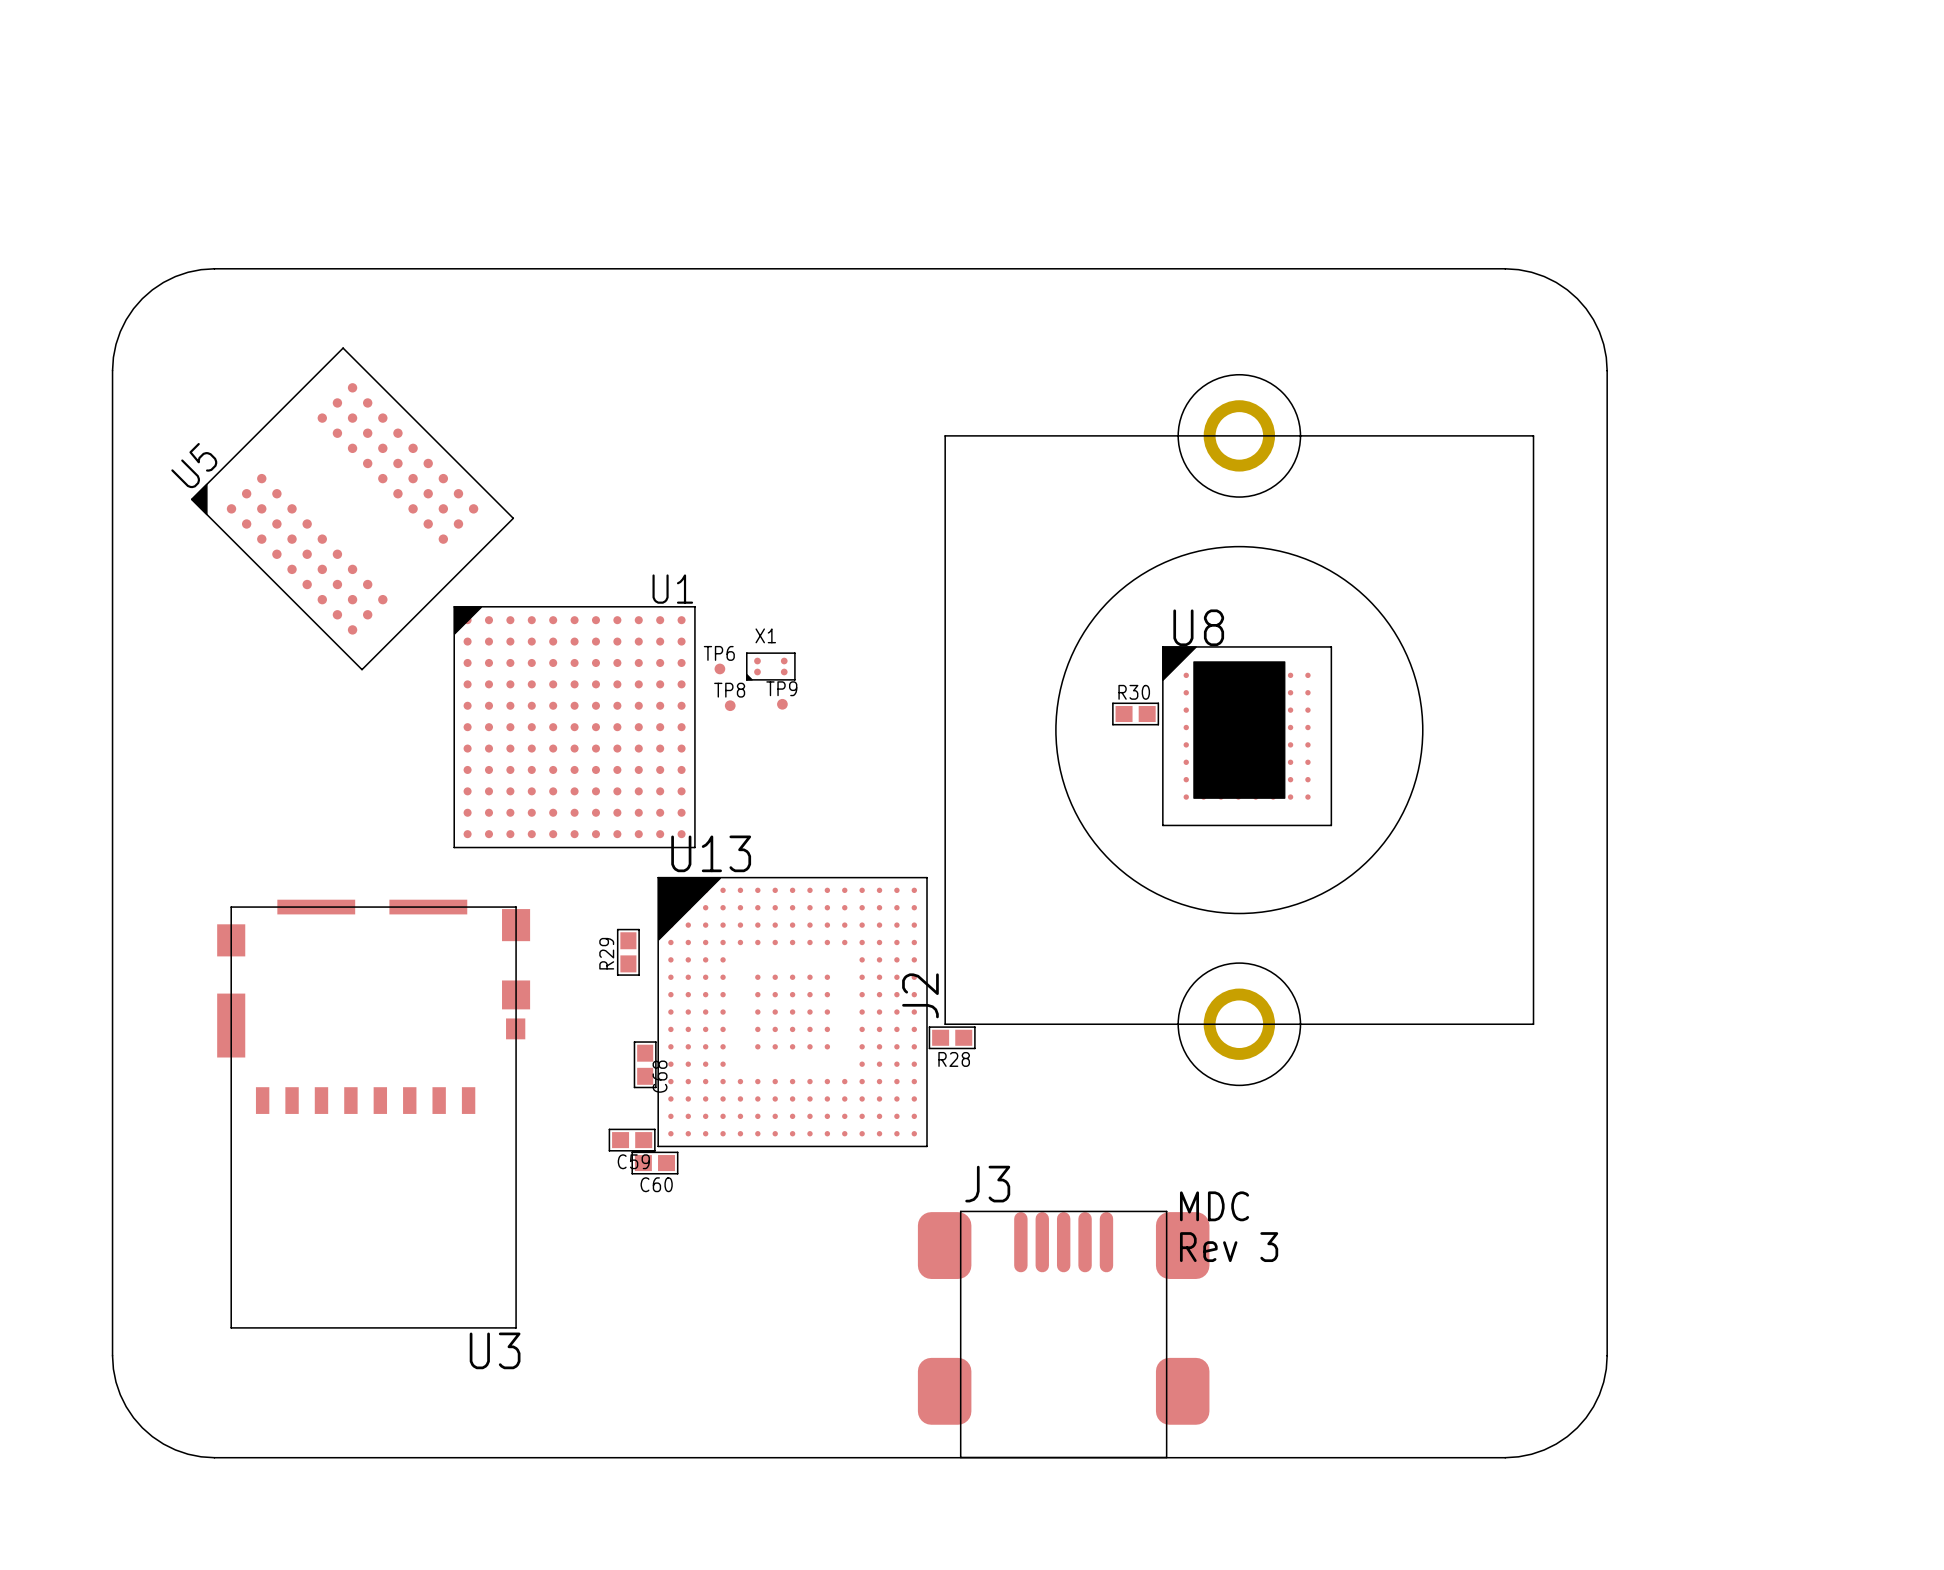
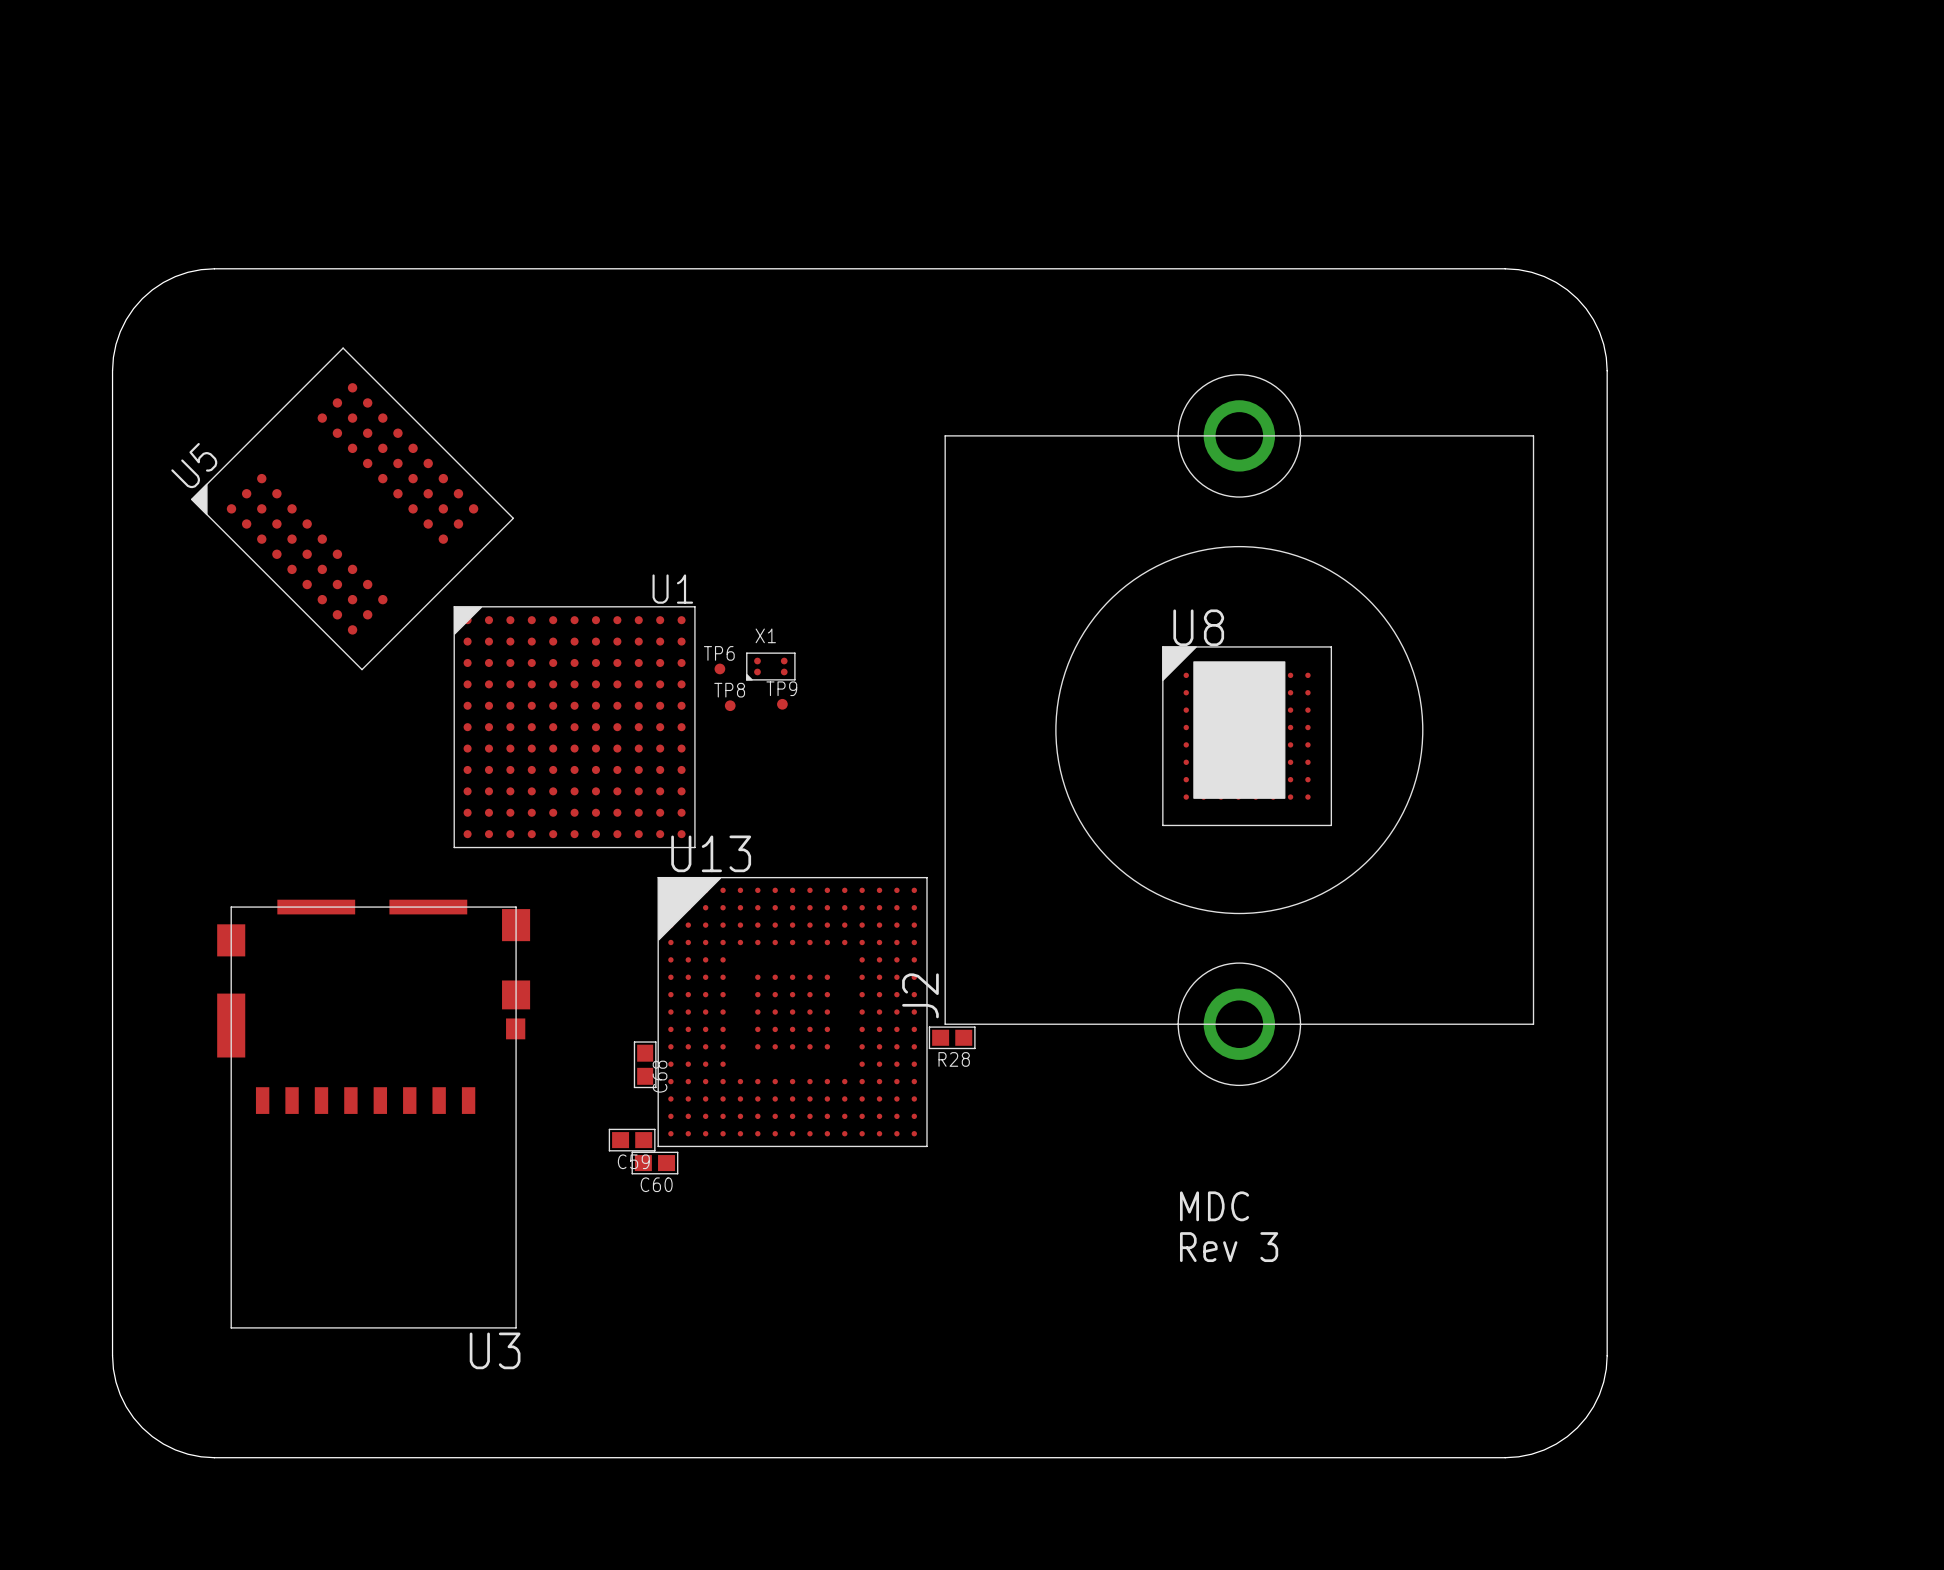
R30: (1135, 713) -> none
R29: (628, 952) -> none
J3: (1063, 1334) -> none

